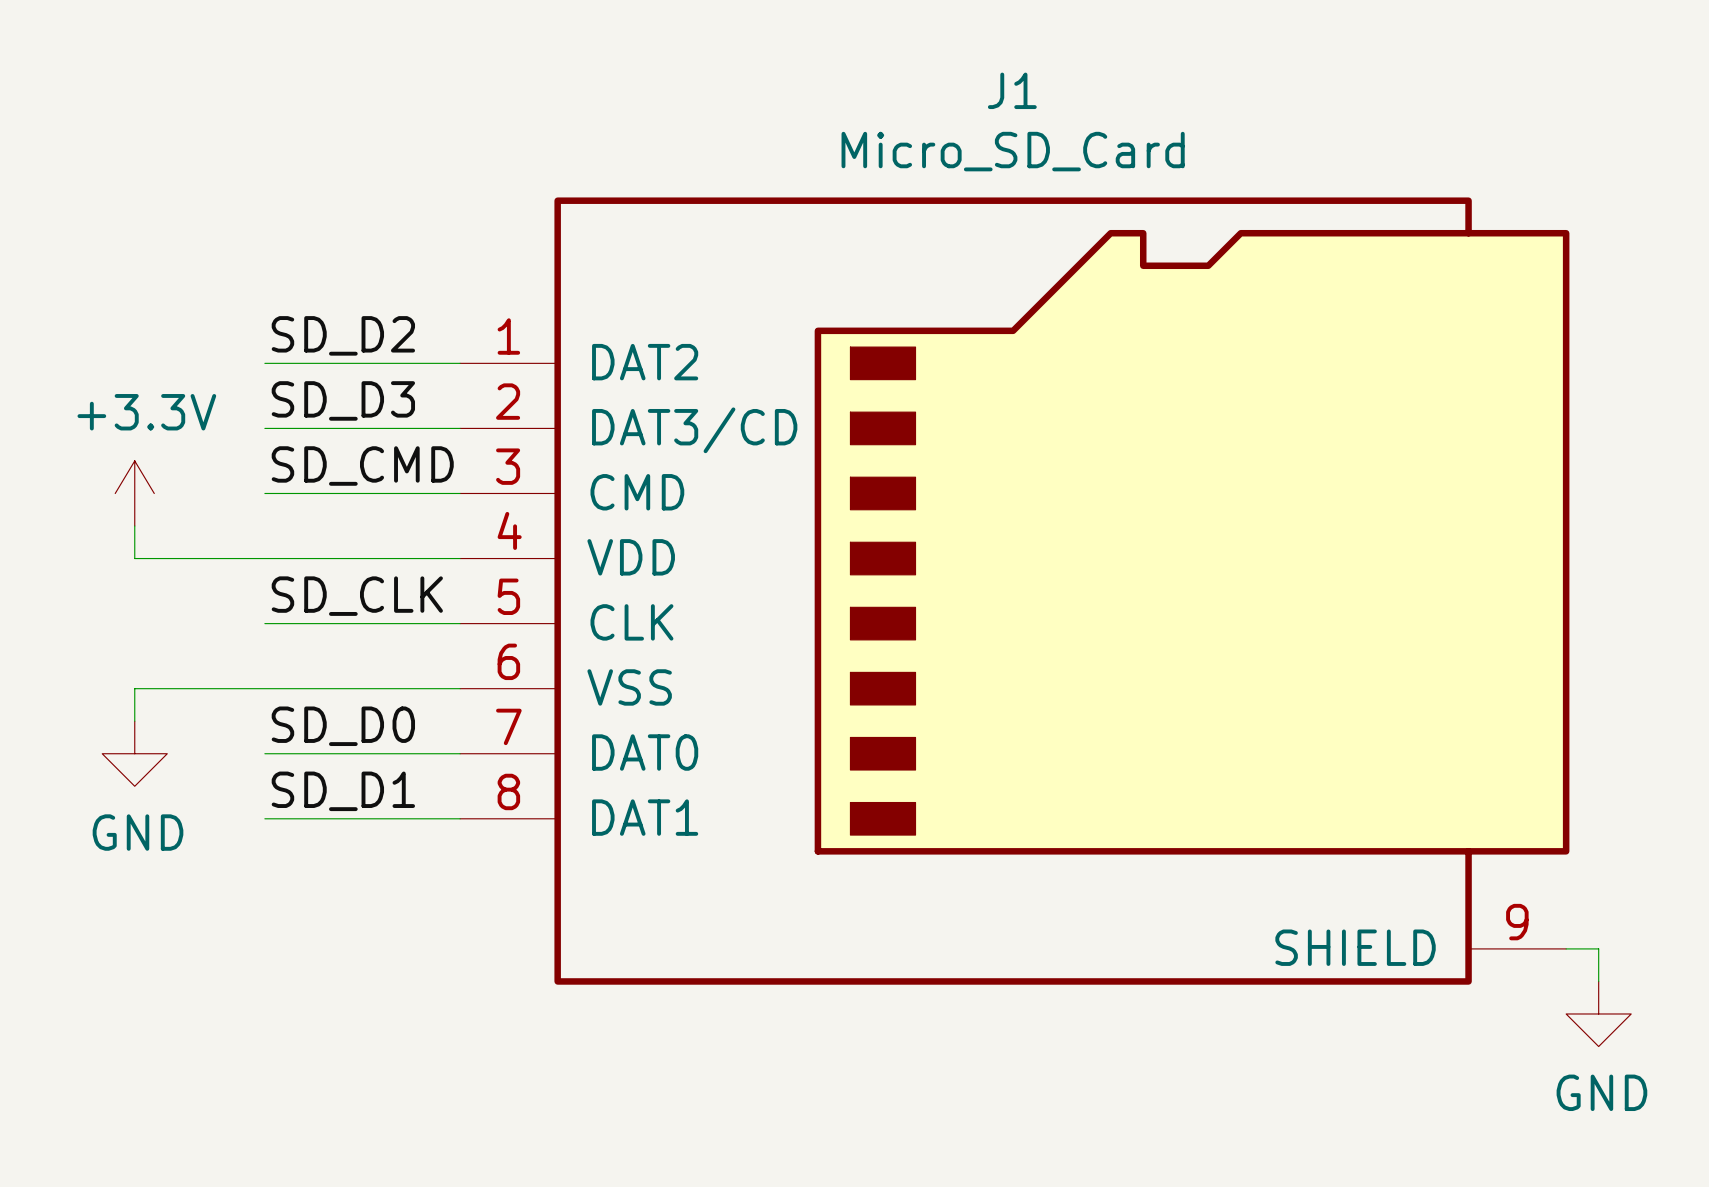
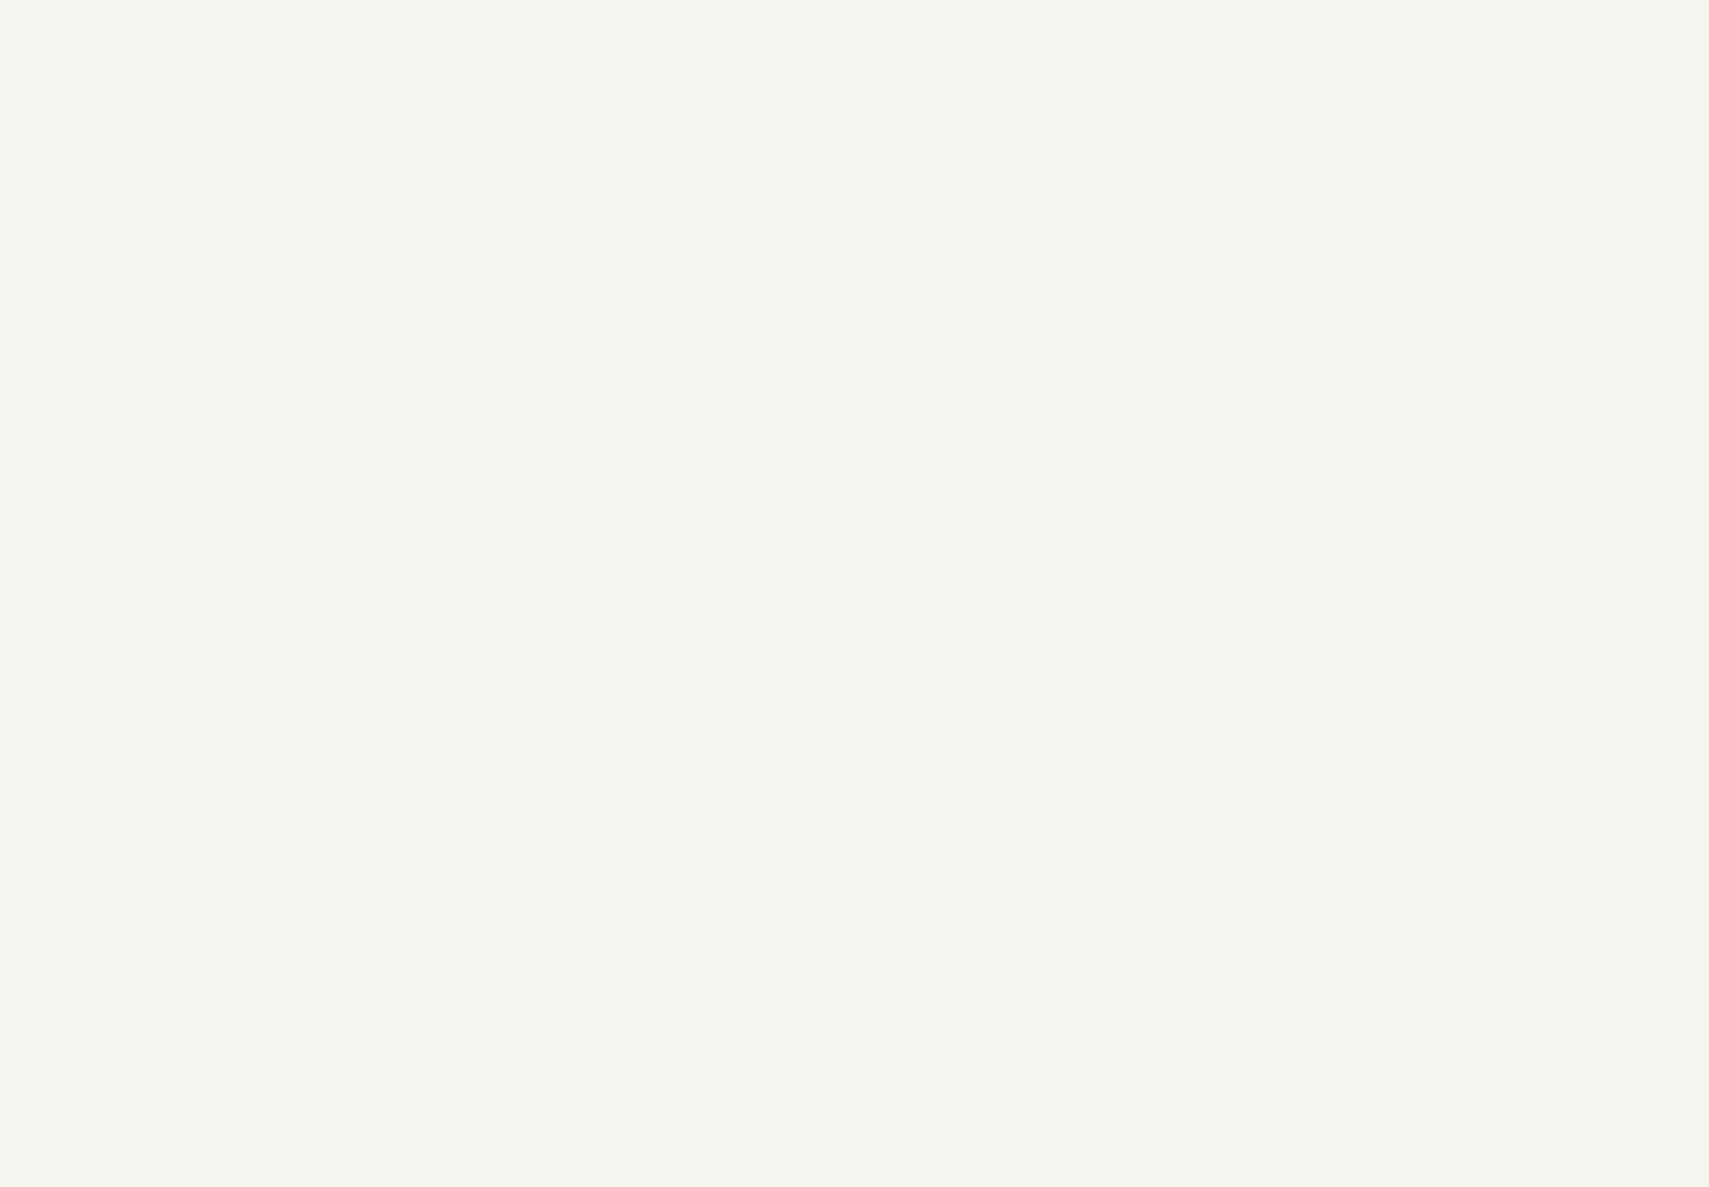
label: SD_D2 (343, 335) -> none
wire: (264, 363) (460, 363) -> none
label: SD_D3 (343, 400) -> none
wire: (264, 428) (460, 428) -> none
label: SD_CMD (362, 466) -> none
power symbol: +3.3V (134, 493) -> none
wire: (264, 493) (460, 493) -> none
wire: (134, 526) (134, 558) (460, 558) -> none
J1: Micro_SD_Card (1014, 591) -> none
label: SD_CLK (357, 596) -> none
wire: (264, 623) (460, 623) -> none
wire: (460, 688) (134, 688) (134, 721) -> none
label: SD_D0 (343, 726) -> none
power symbol: GND (134, 753) -> none
wire: (264, 753) (460, 753) -> none
label: SD_D1 (343, 791) -> none
wire: (264, 818) (460, 818) -> none
wire: (1566, 948) (1598, 948) (1598, 981) -> none
power symbol: GND (1598, 1013) -> none

